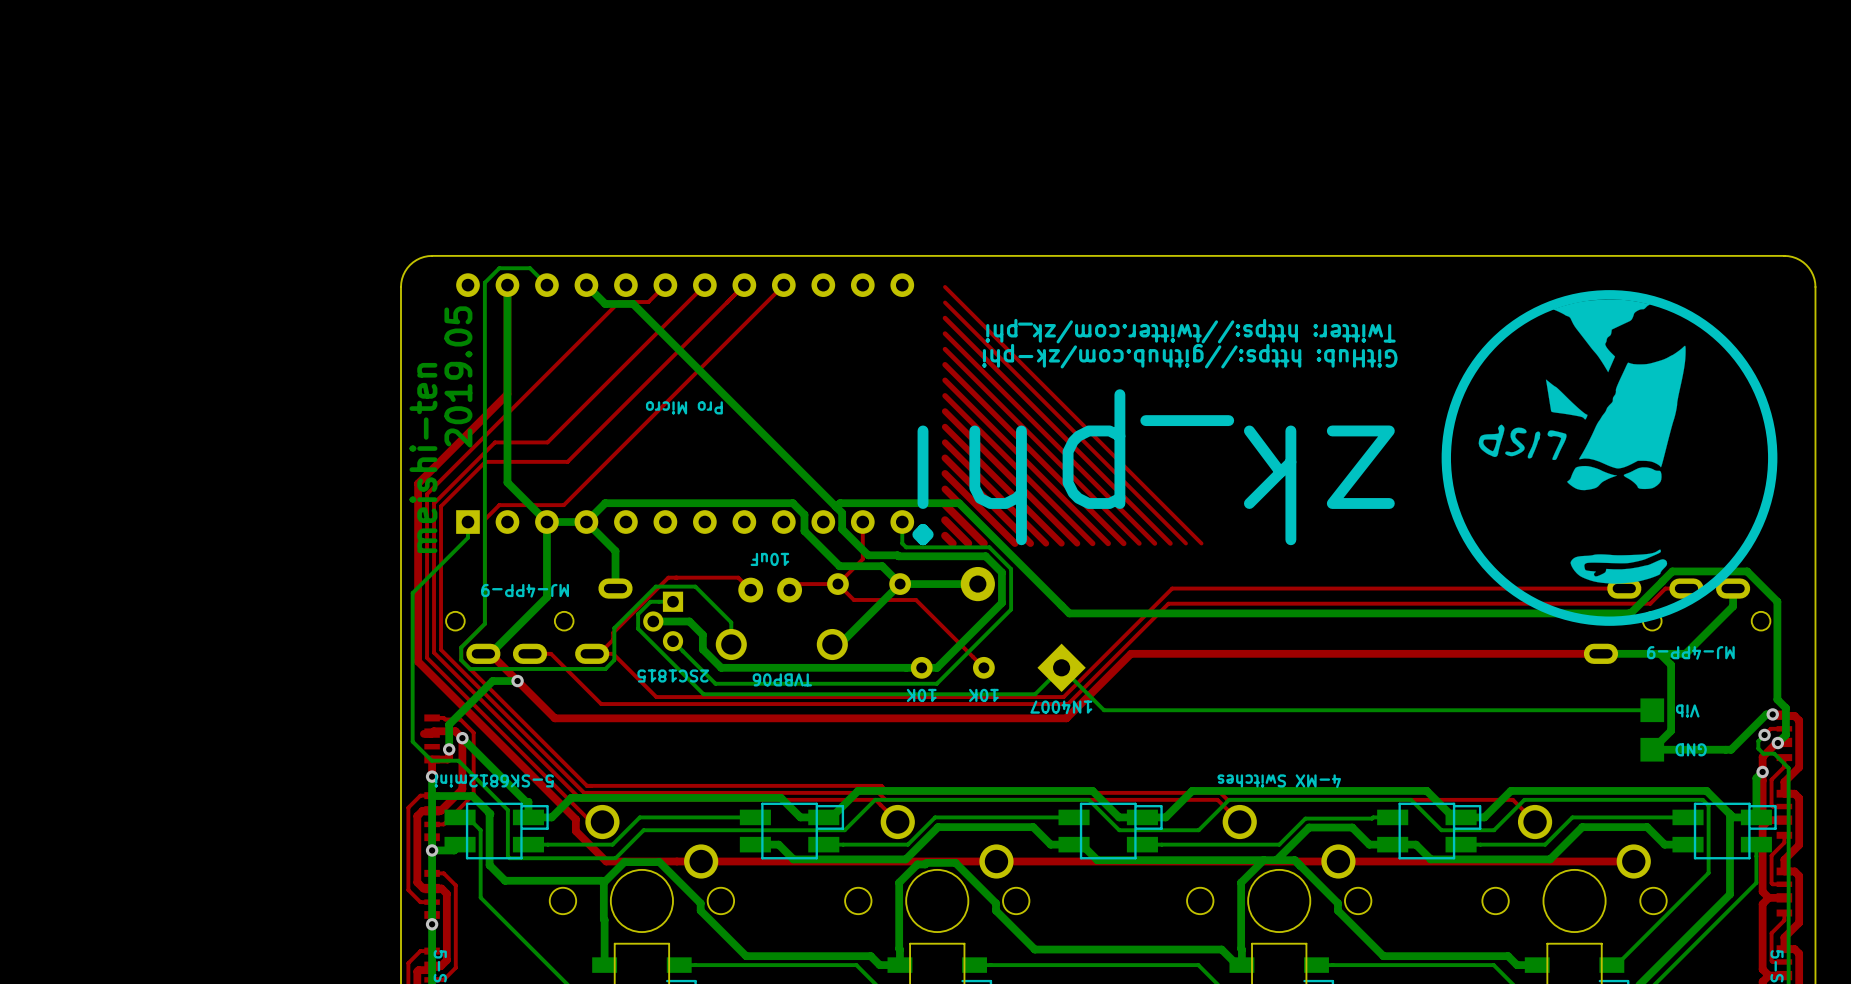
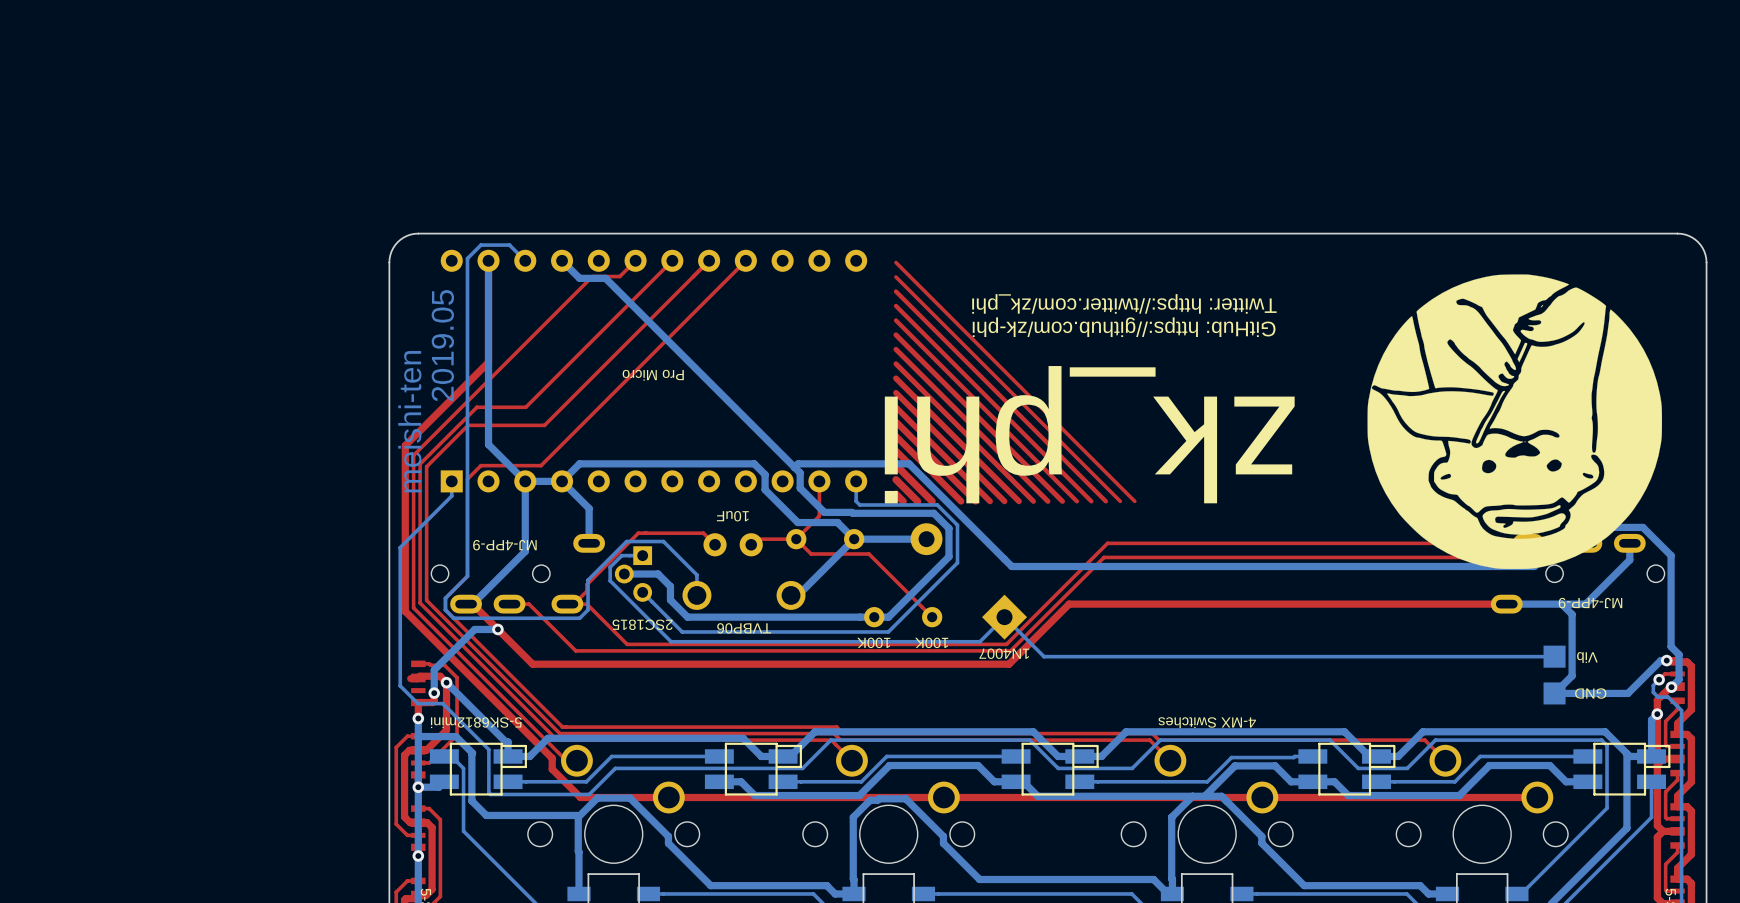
drawing shape: [1441, 290, 1778, 626] -> [1367, 274, 1663, 570]
drawing: [1478, 299, 1686, 584] -> none
text: 10K (921, 695) -> 100K (873, 642)
text: 10K (983, 695) -> 100K (931, 642)

